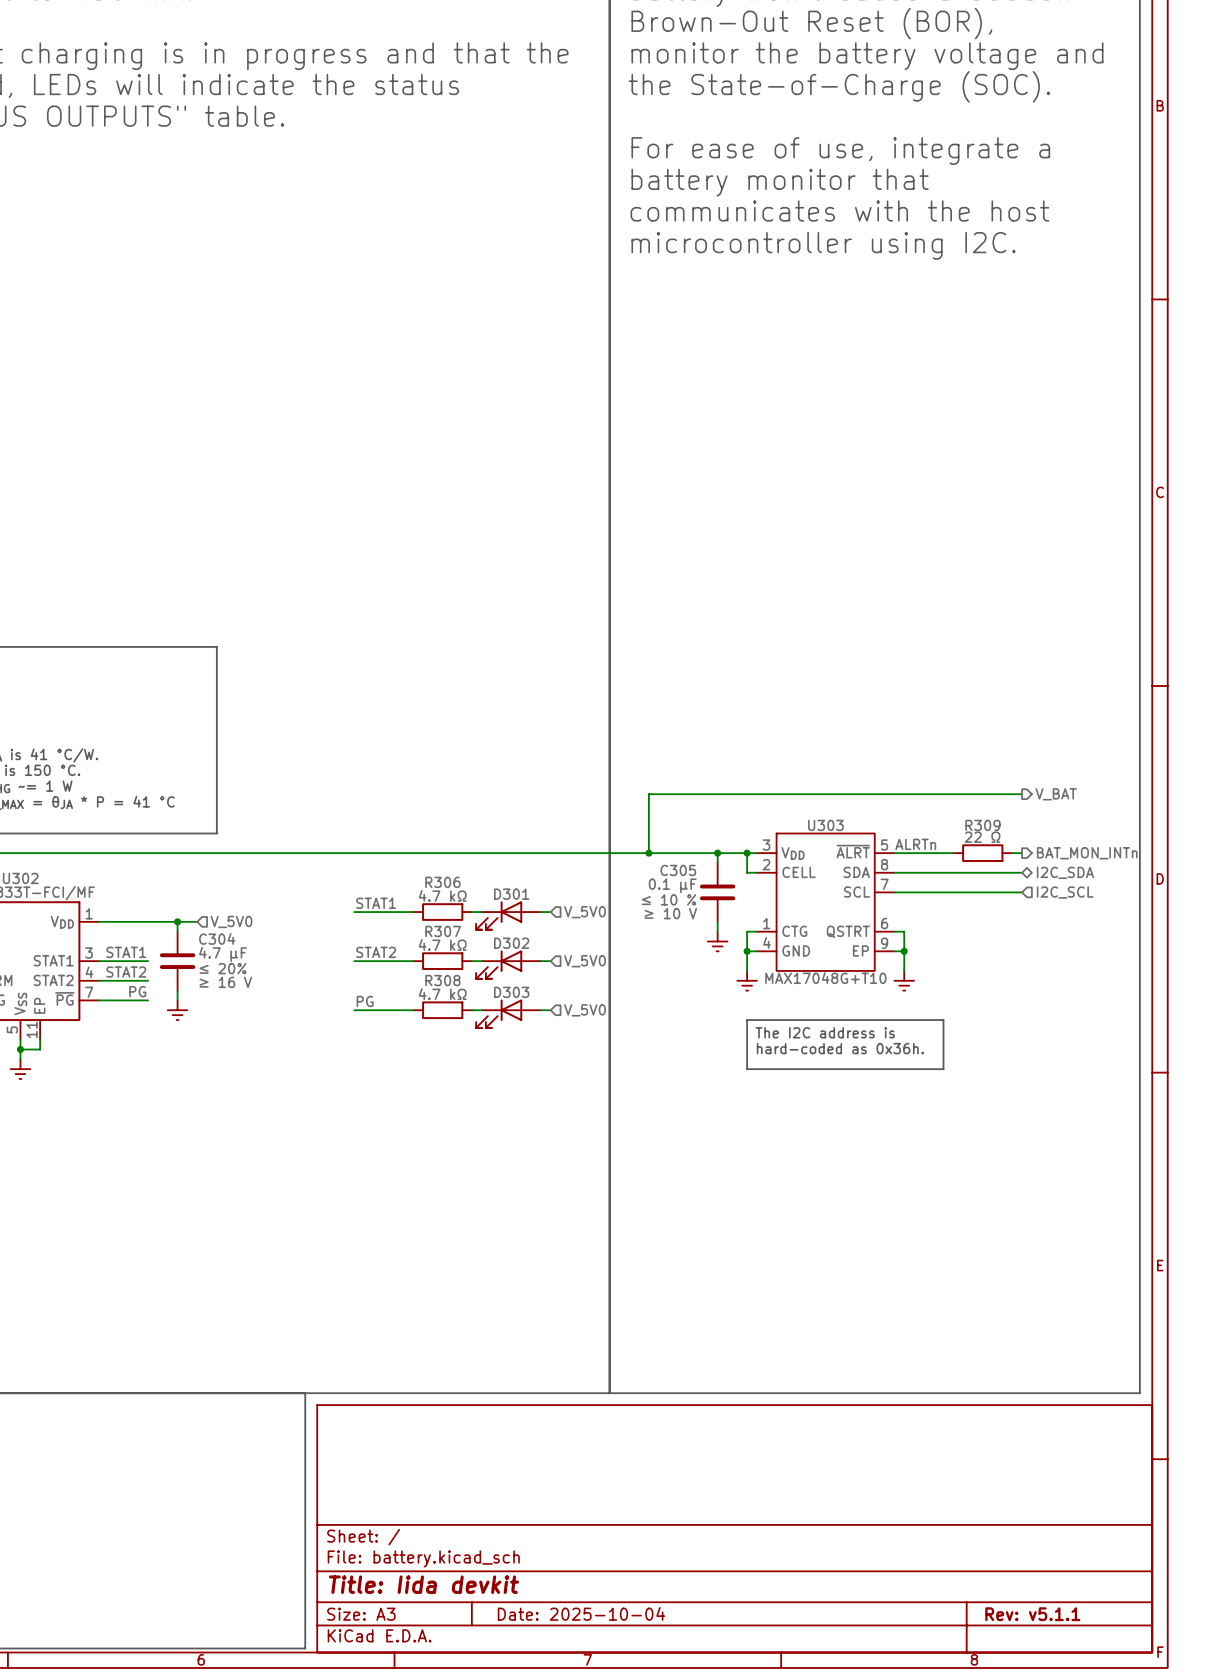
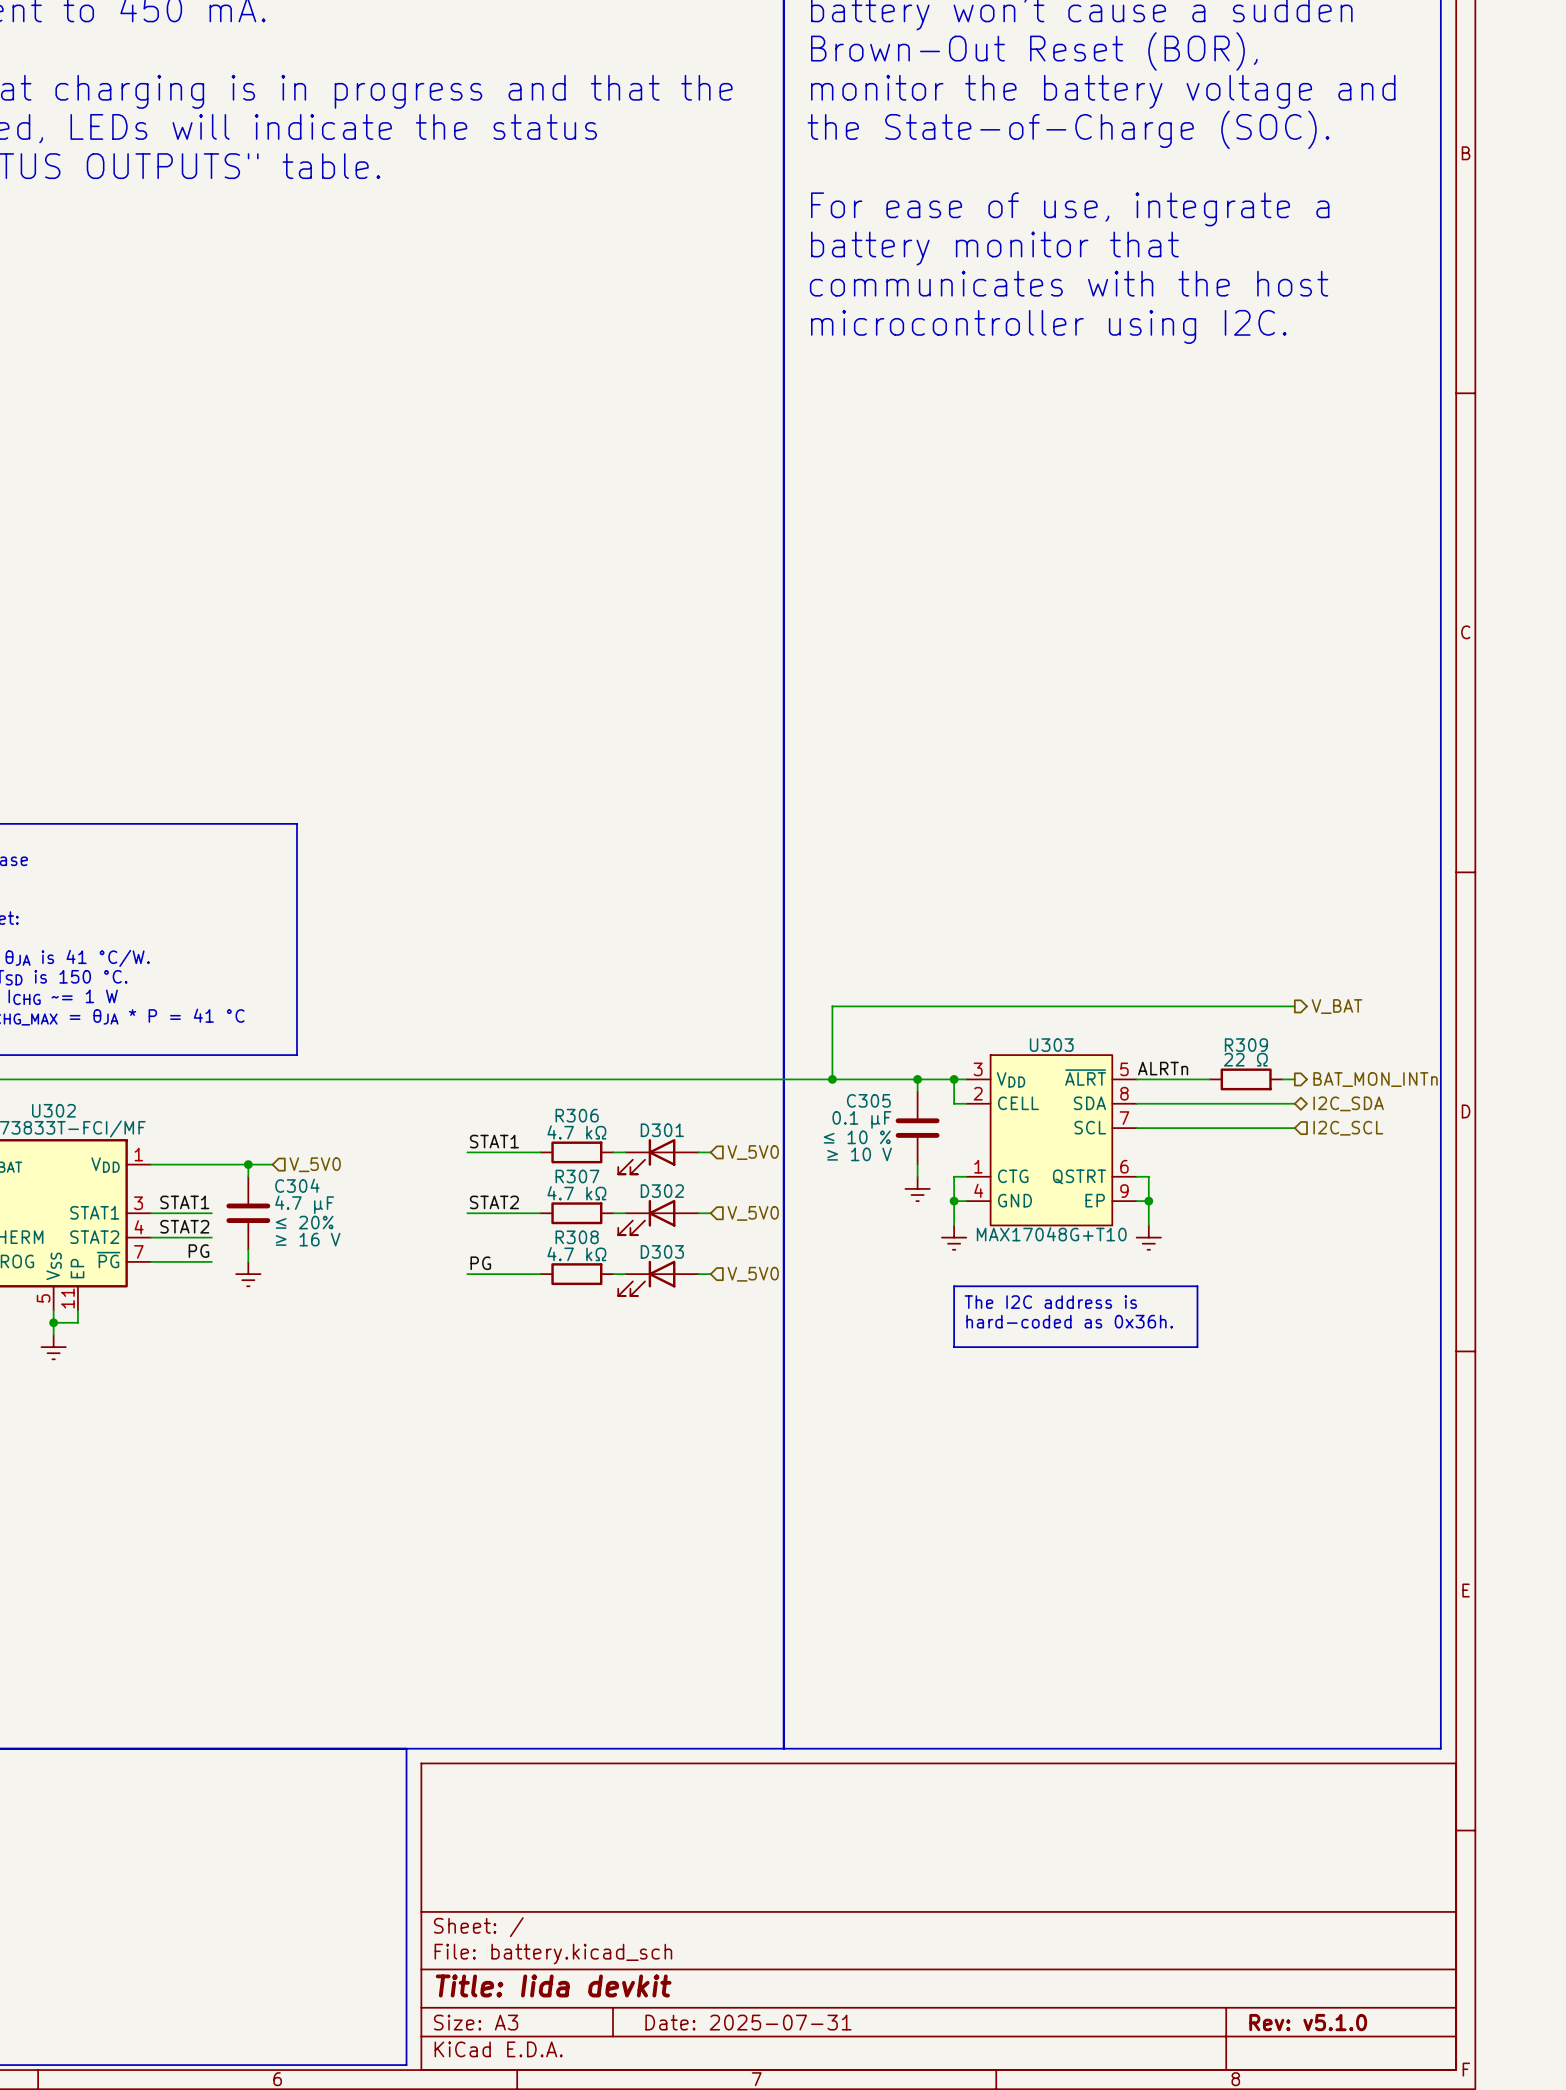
title block: Date: 2025-10-04 (581, 1613) -> Date: 2025-07-31 (748, 2022)
title block: Rev: v5.1.1 (1032, 1614) -> Rev: v5.1.0 (1308, 2022)

